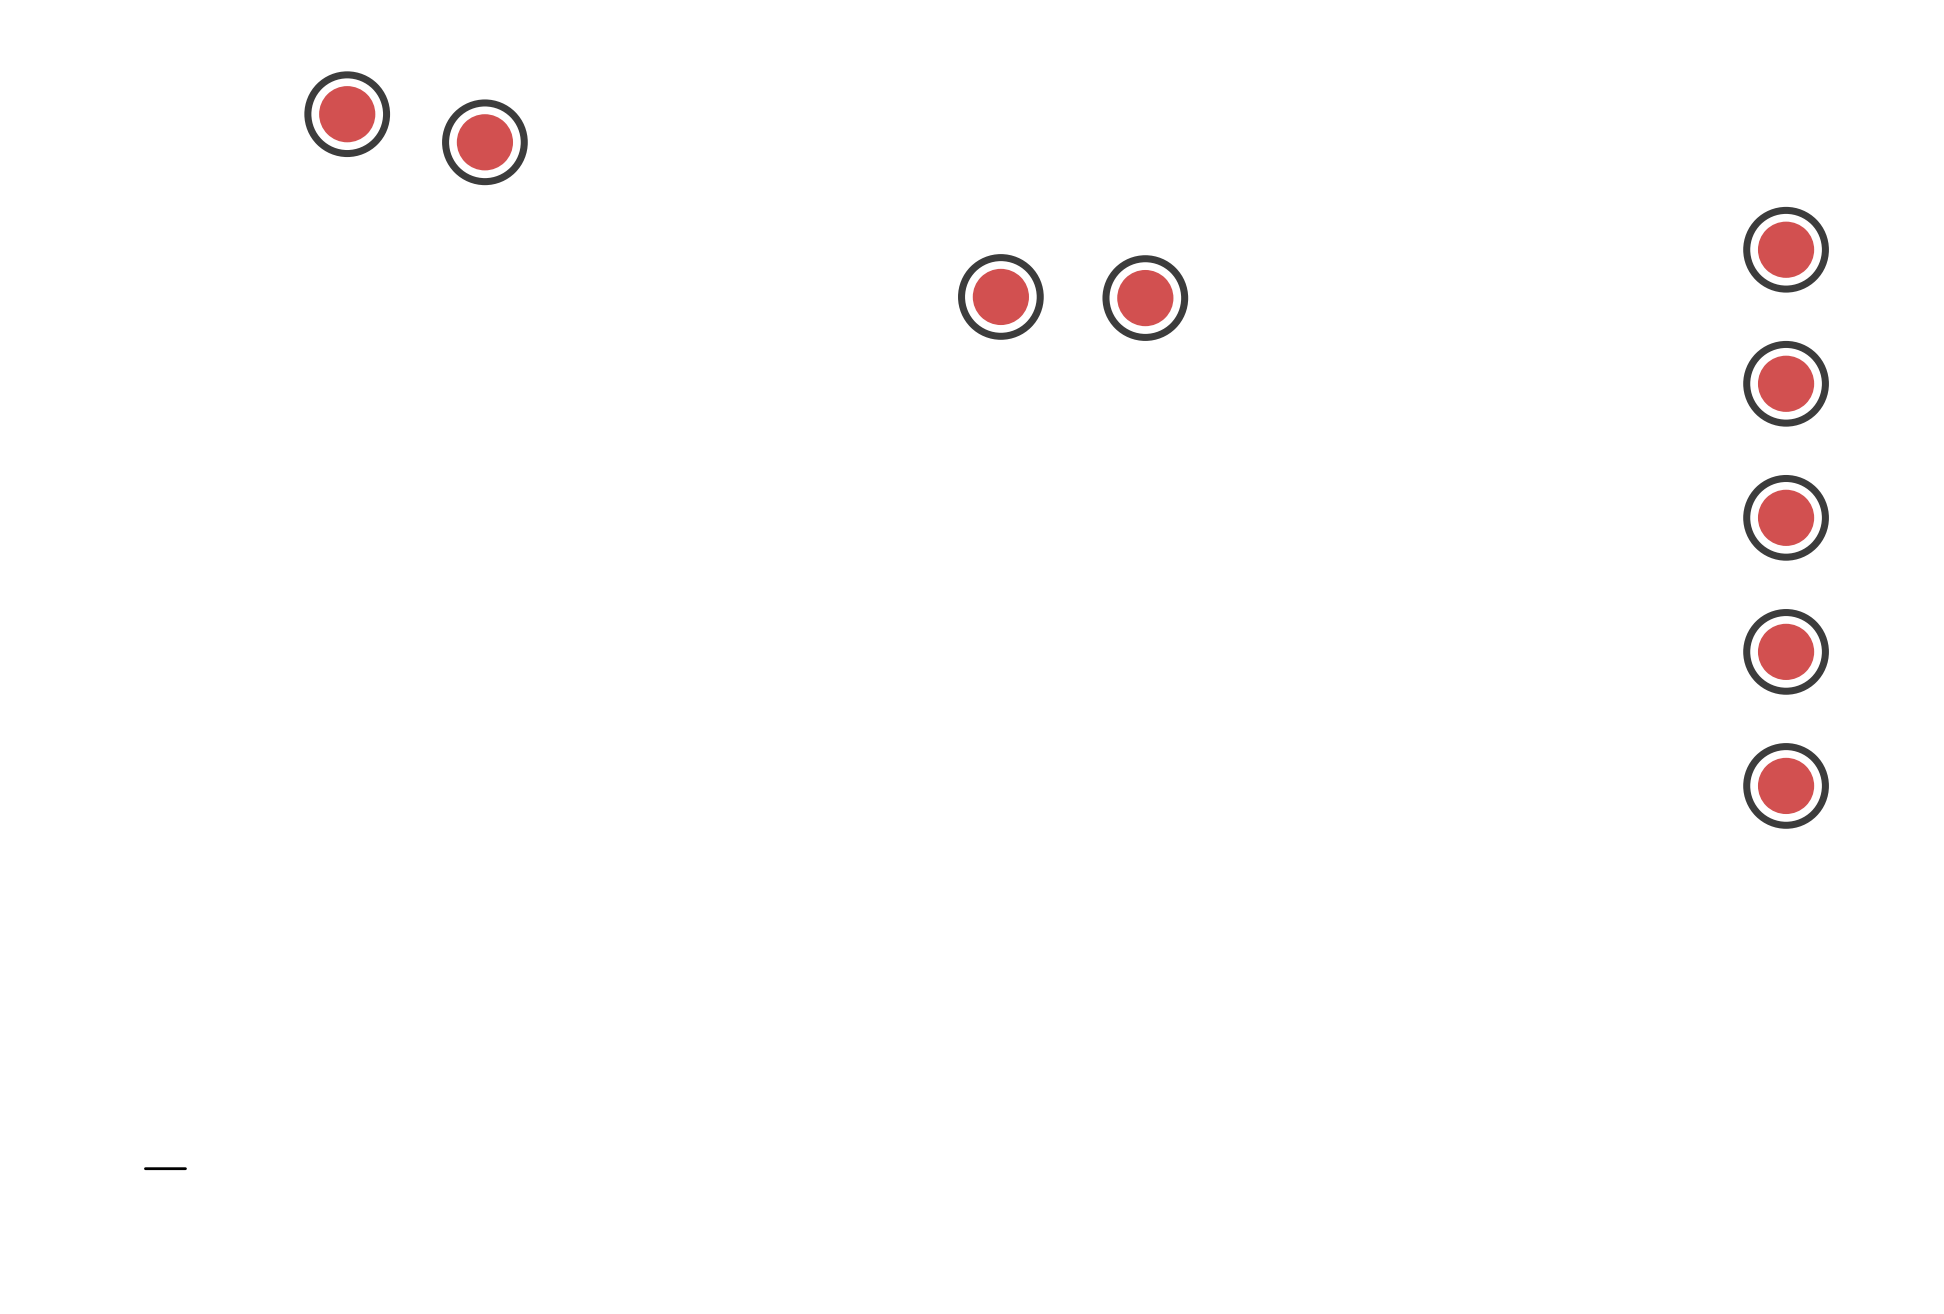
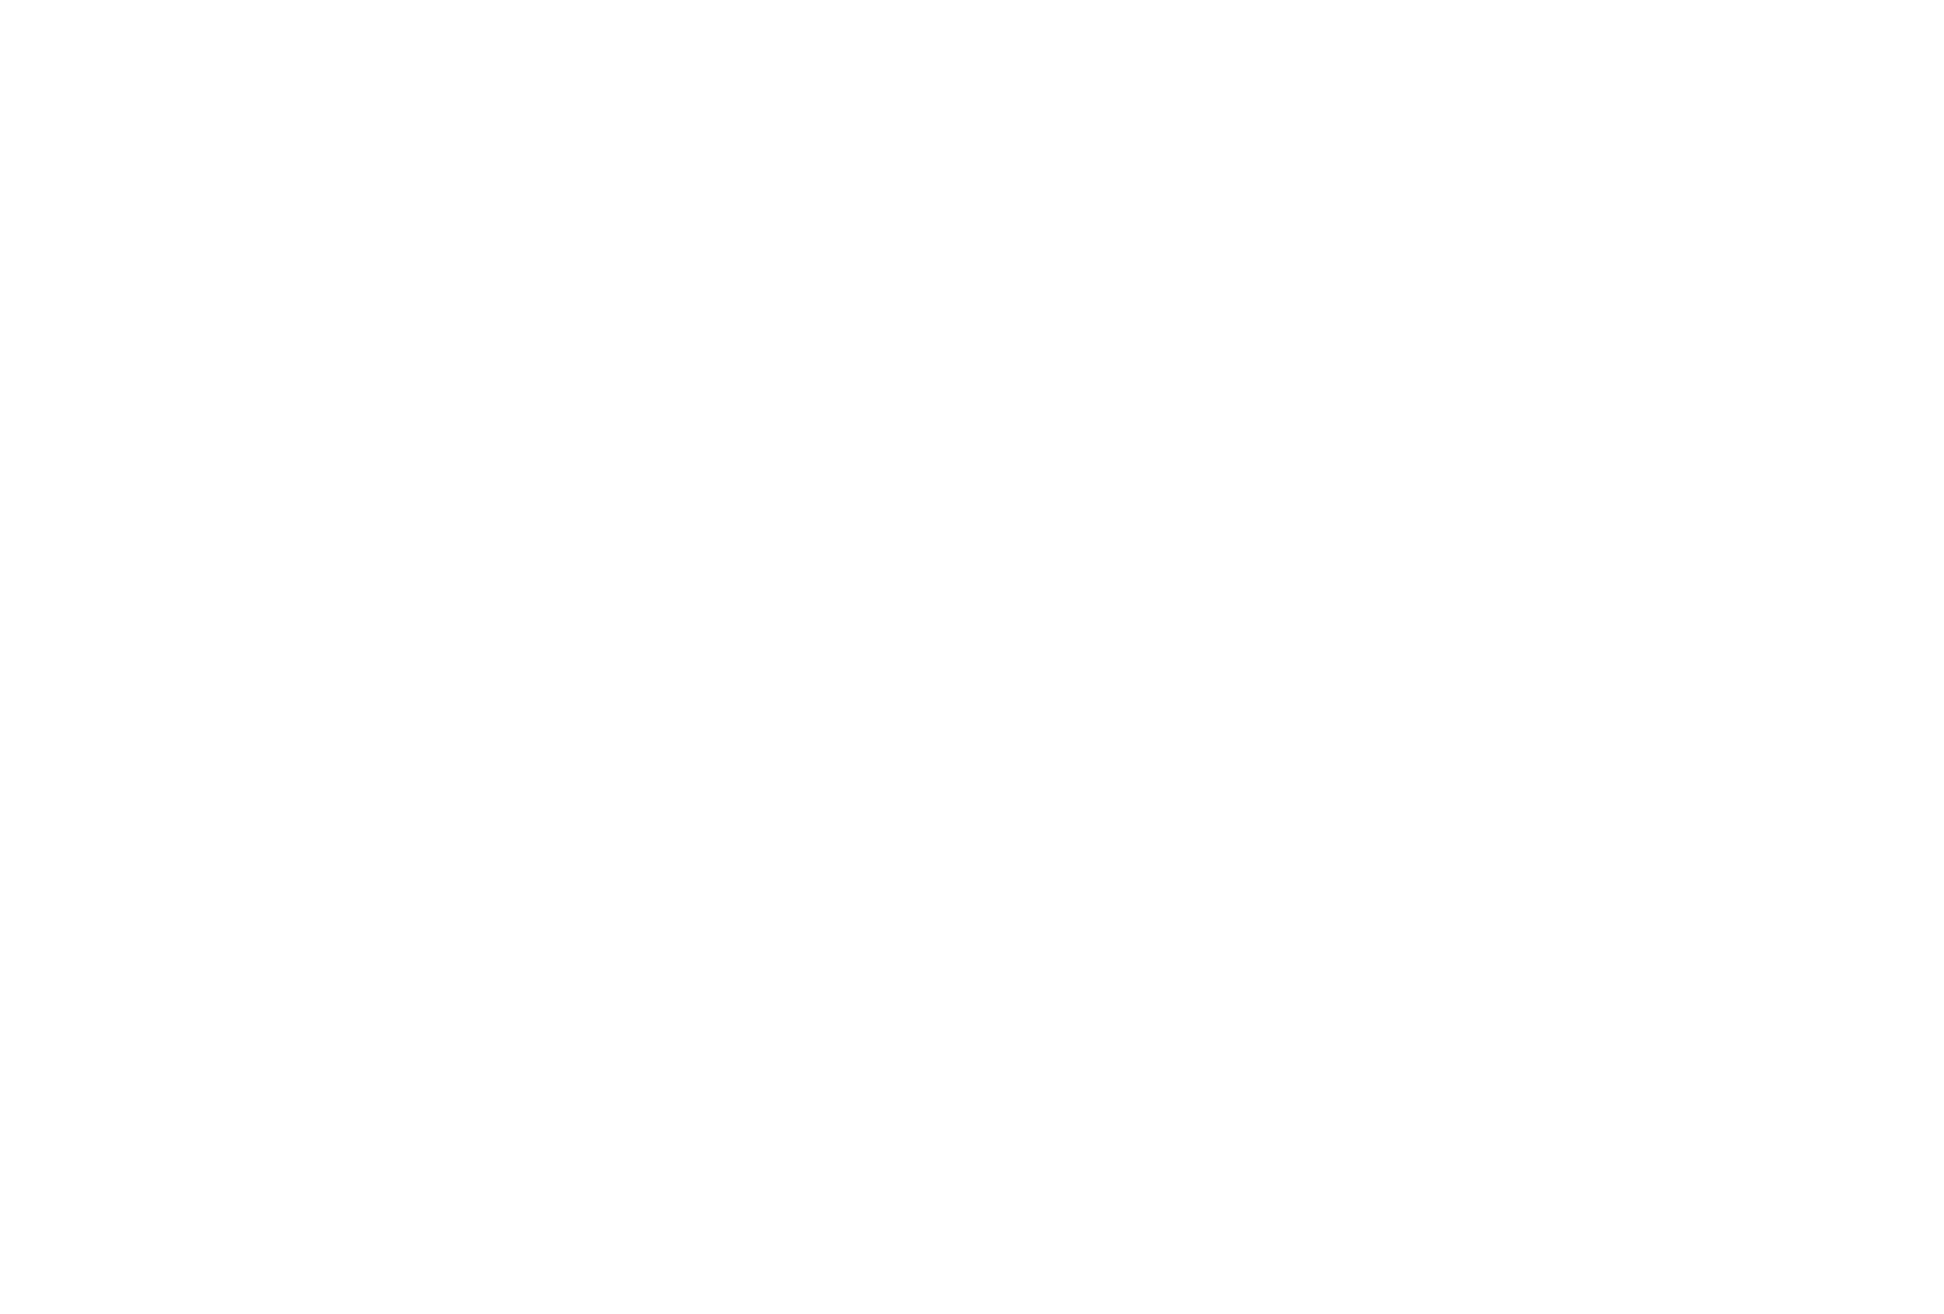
part: (347, 114) -> none
part: (484, 142) -> none
part: (1786, 249) -> none
part: (1000, 296) -> none
part: (1145, 298) -> none
part: (1786, 383) -> none
part: (1786, 517) -> none
part: (1786, 651) -> none
part: (1786, 785) -> none
board edge: (145, 1168) (185, 1168) -> none

